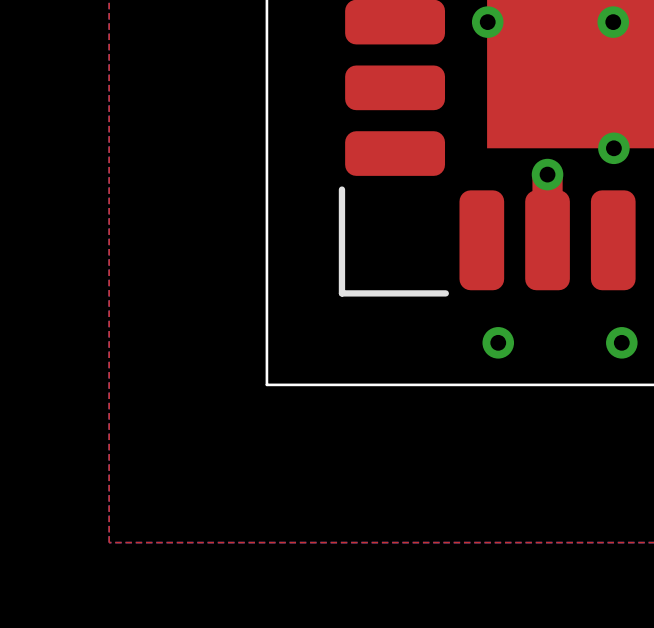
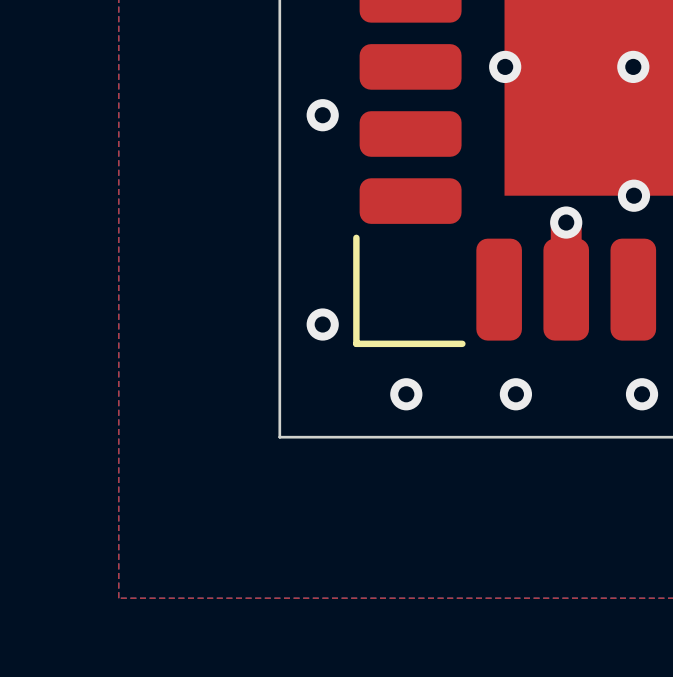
via: none -> (322, 115)
via: none -> (322, 324)
via: none -> (406, 394)

